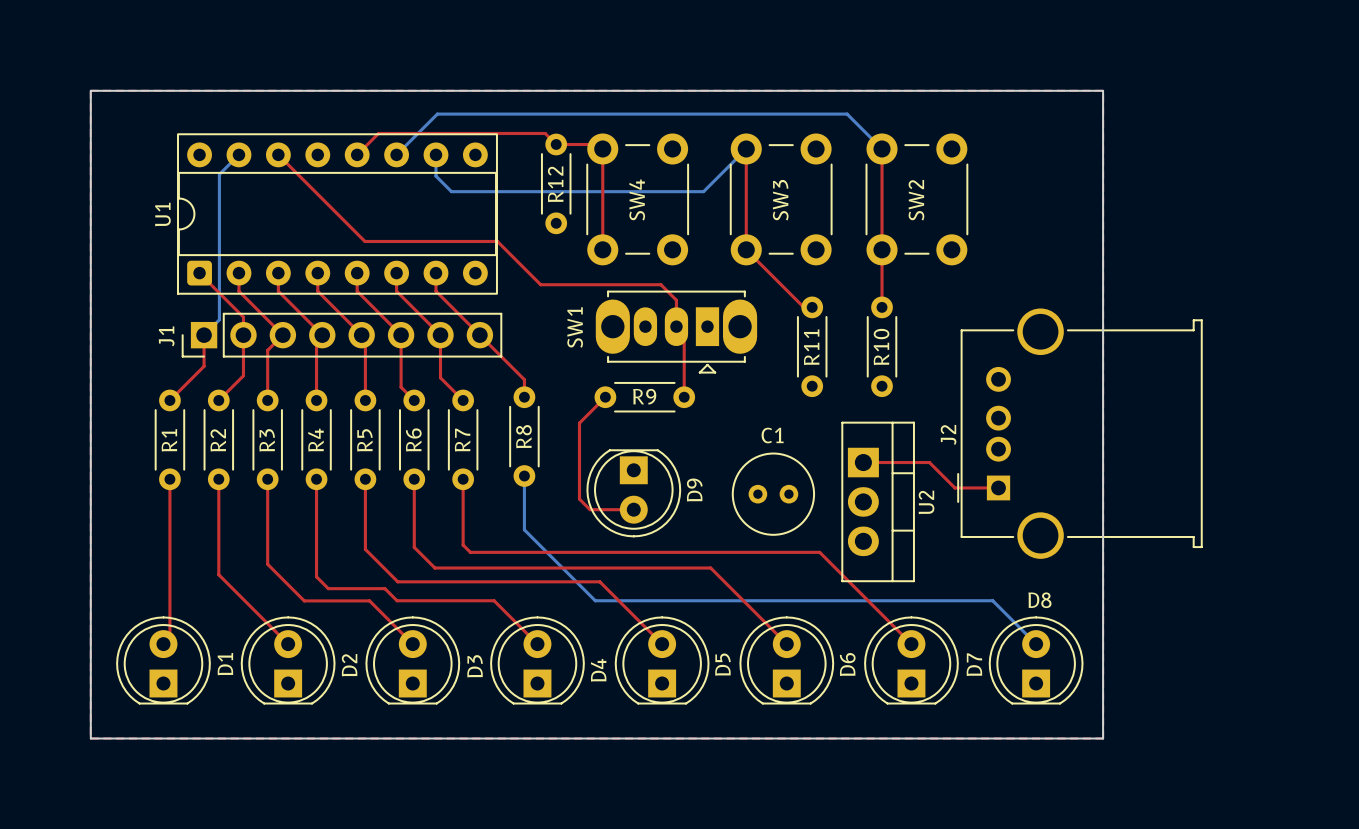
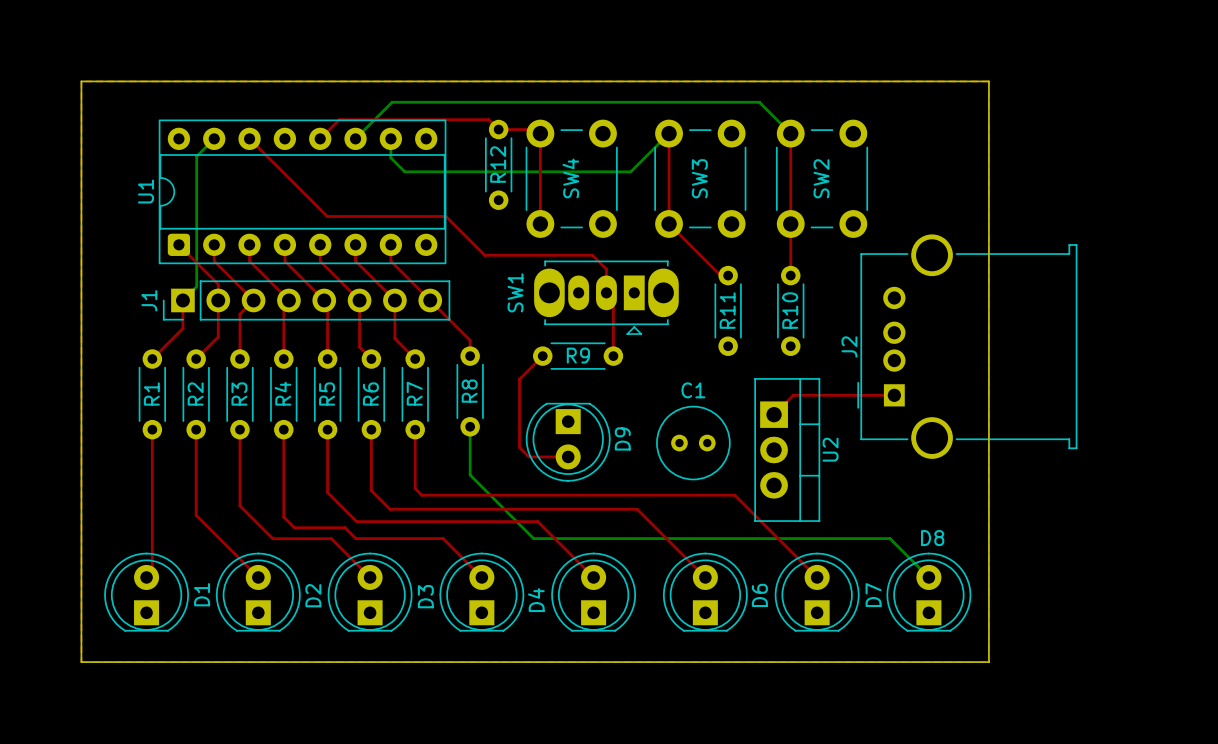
J2 position: (1079, 433) -> (967, 346)
top track: (863, 462) (929, 462) (954, 487) (998, 487) -> (774, 414) (793, 395) (894, 395)
D5 name: D5 (722, 664) -> none

